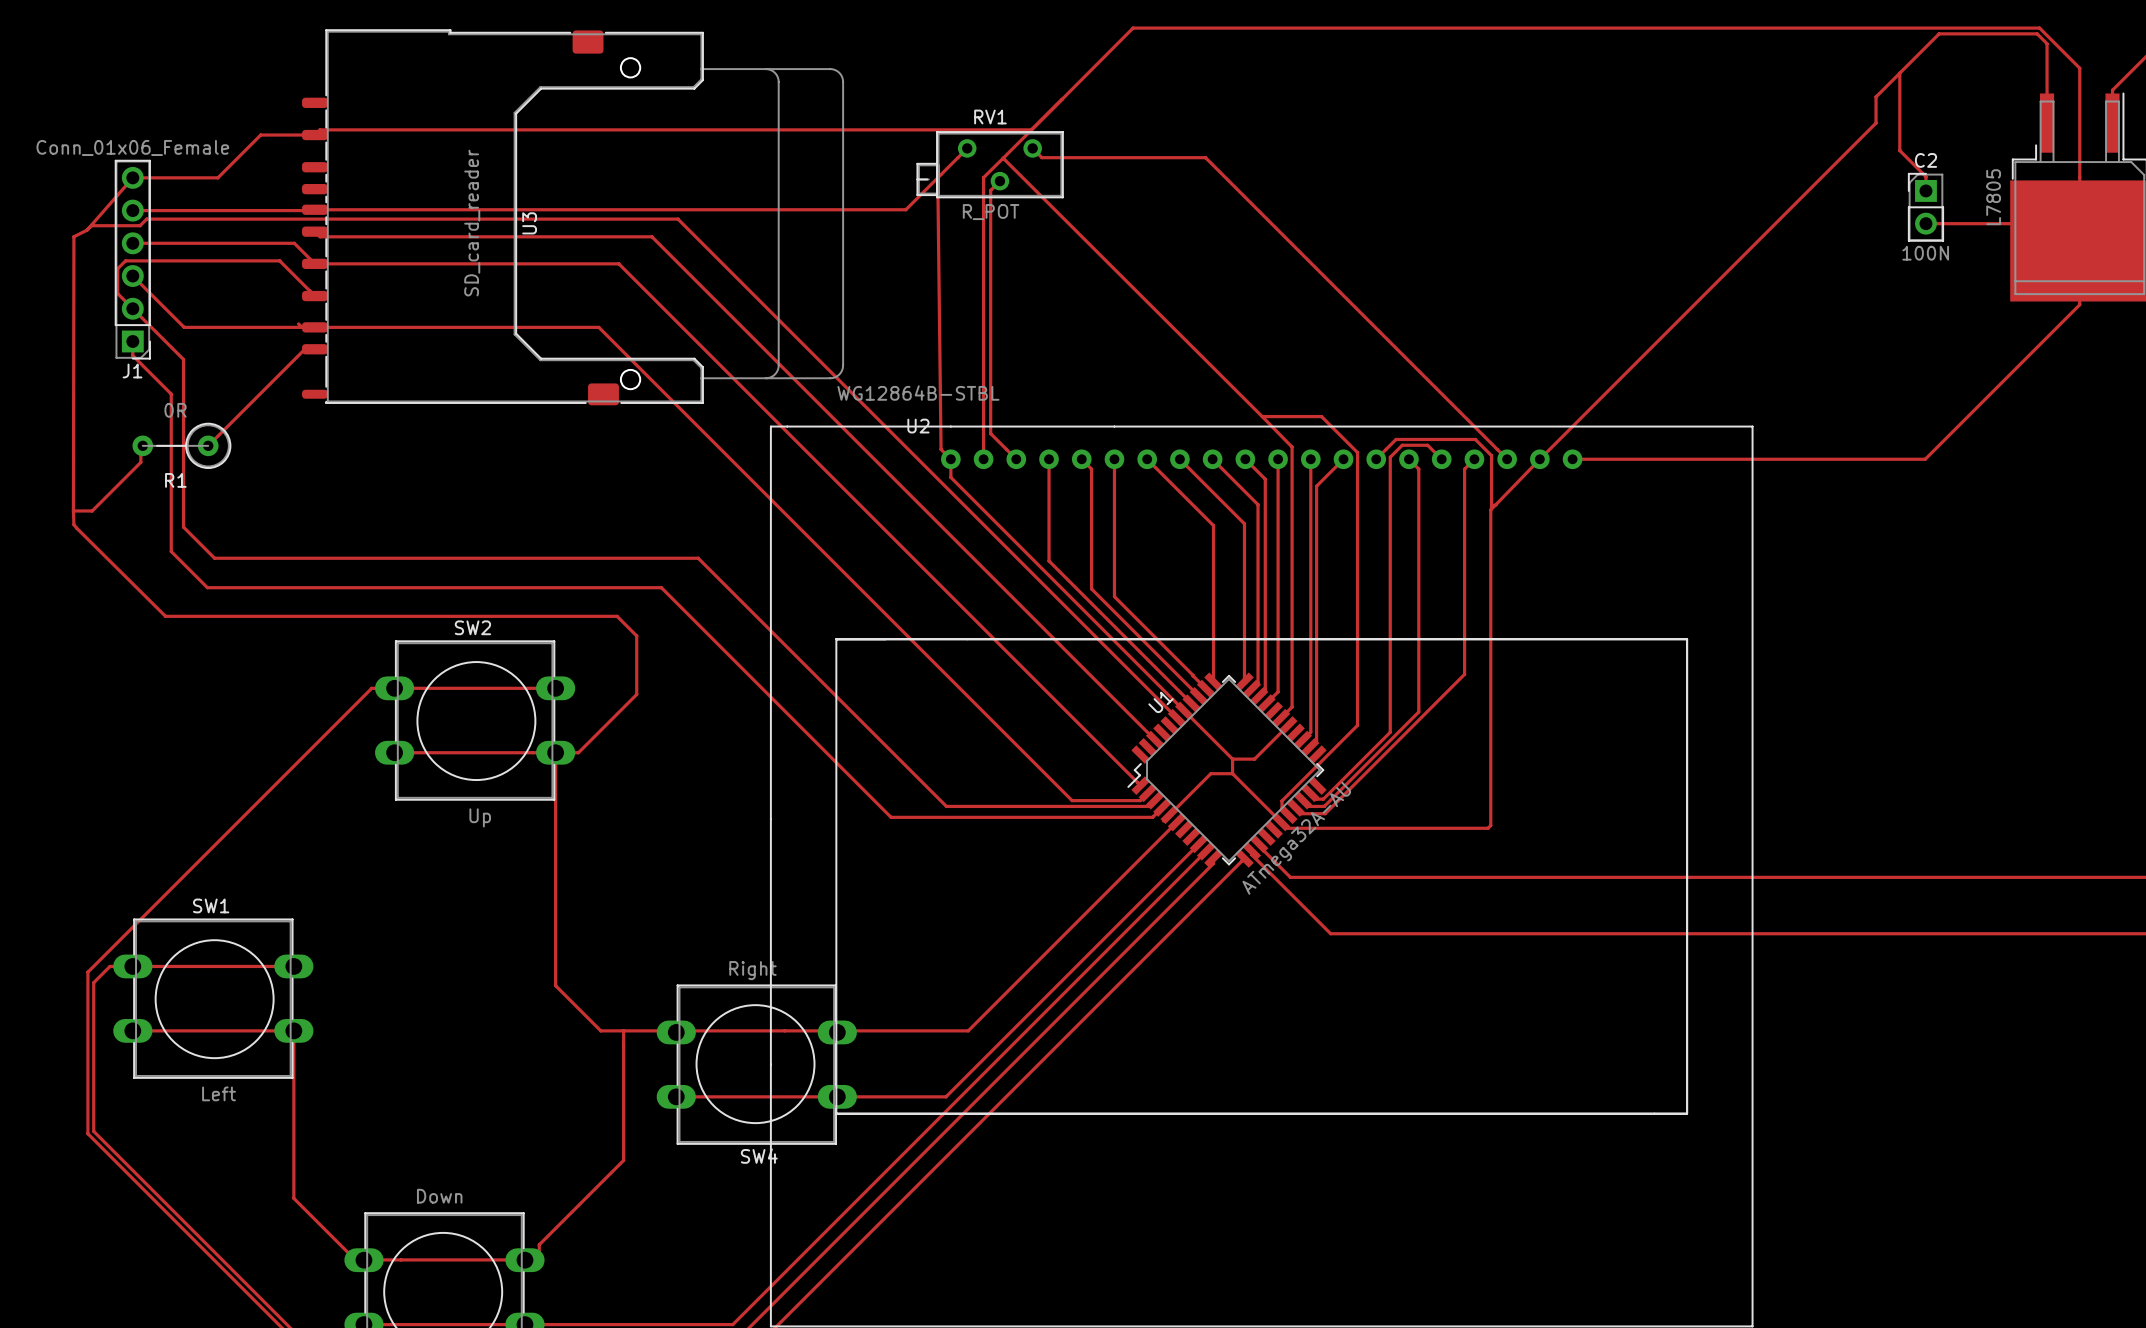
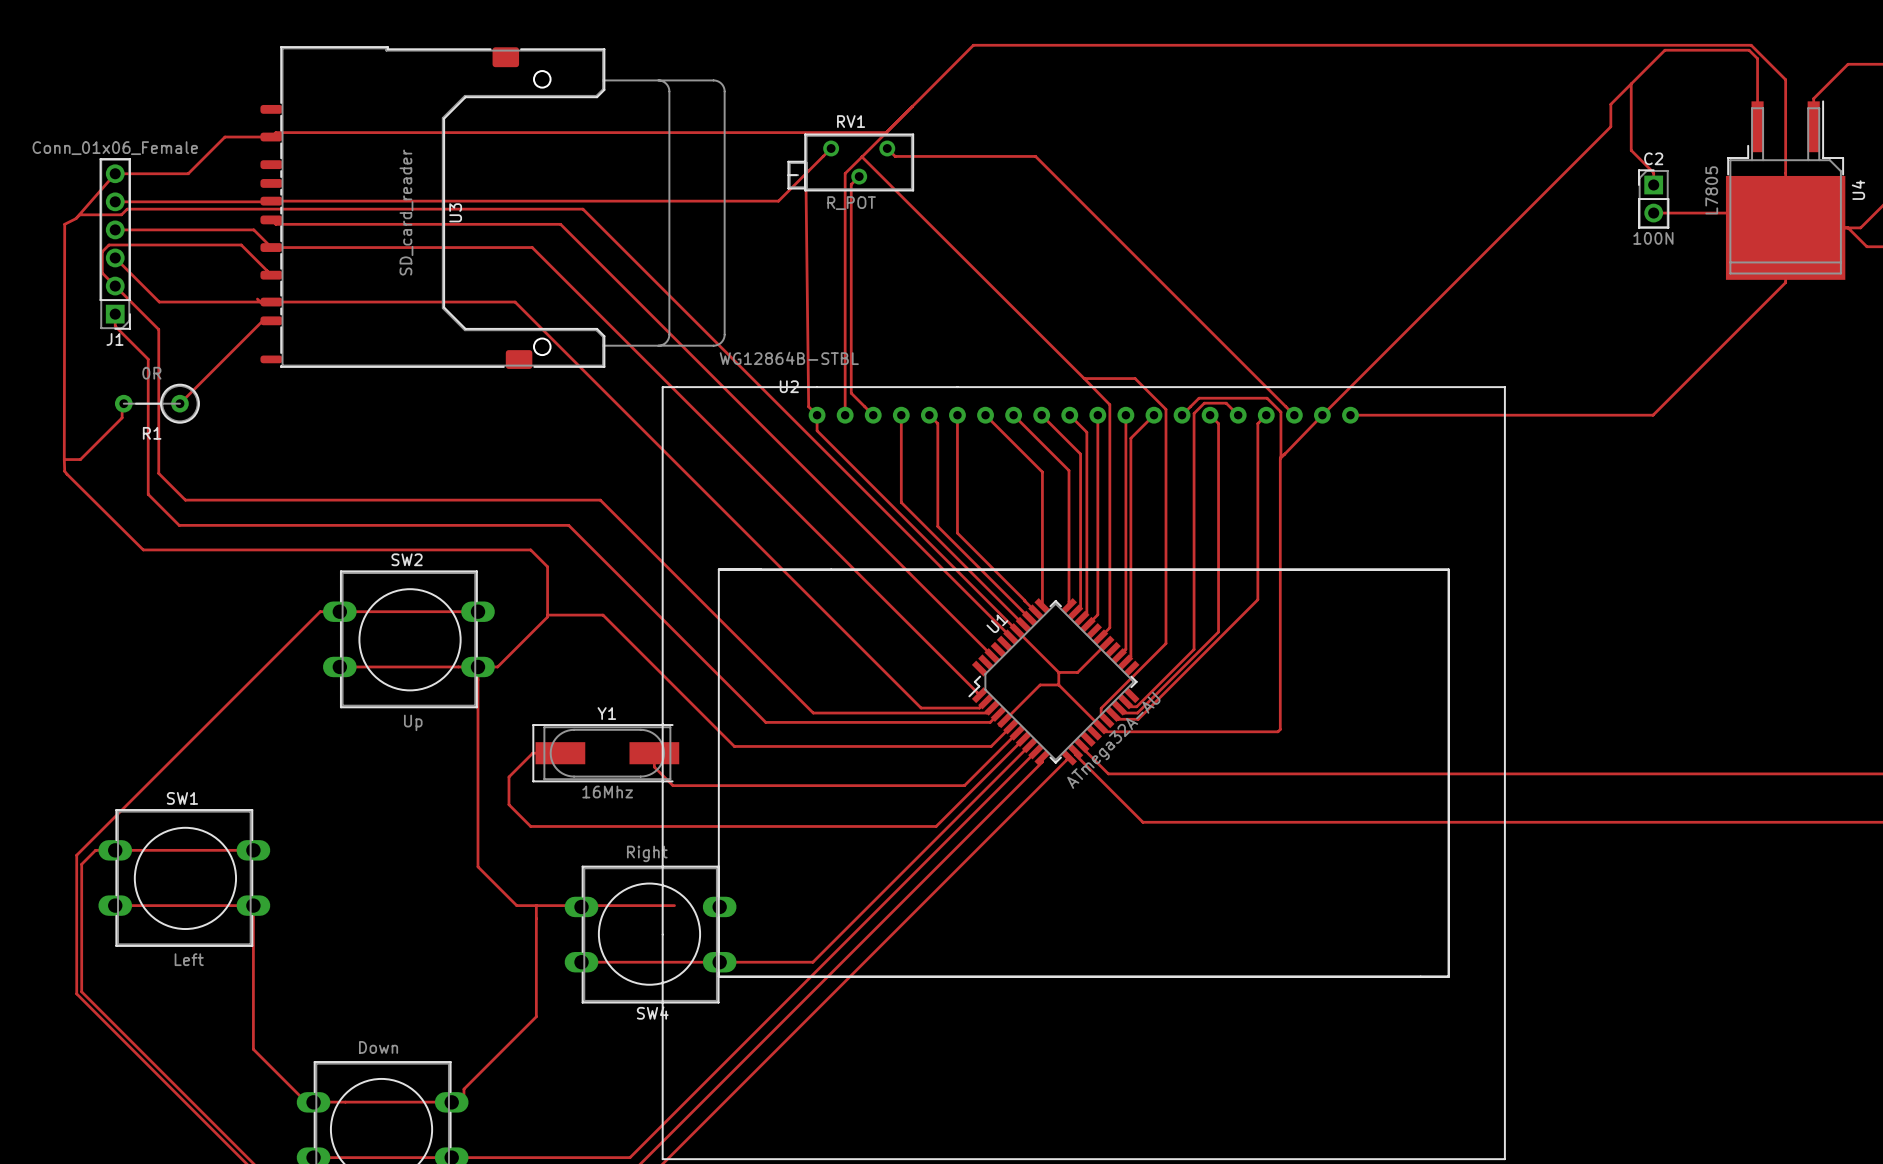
top track: none -> (1017, 732) (964, 785) (672, 785) (654, 767) (654, 753)
top track: none -> (1023, 738) (936, 826) (530, 826) (508, 804) (508, 777) (532, 753) (560, 753)
top track: (1153, 845) (968, 1030) (784, 1030) -> (991, 746) (734, 746) (603, 615) (547, 615)
Y1: none -> 16Mhz (605, 753)

